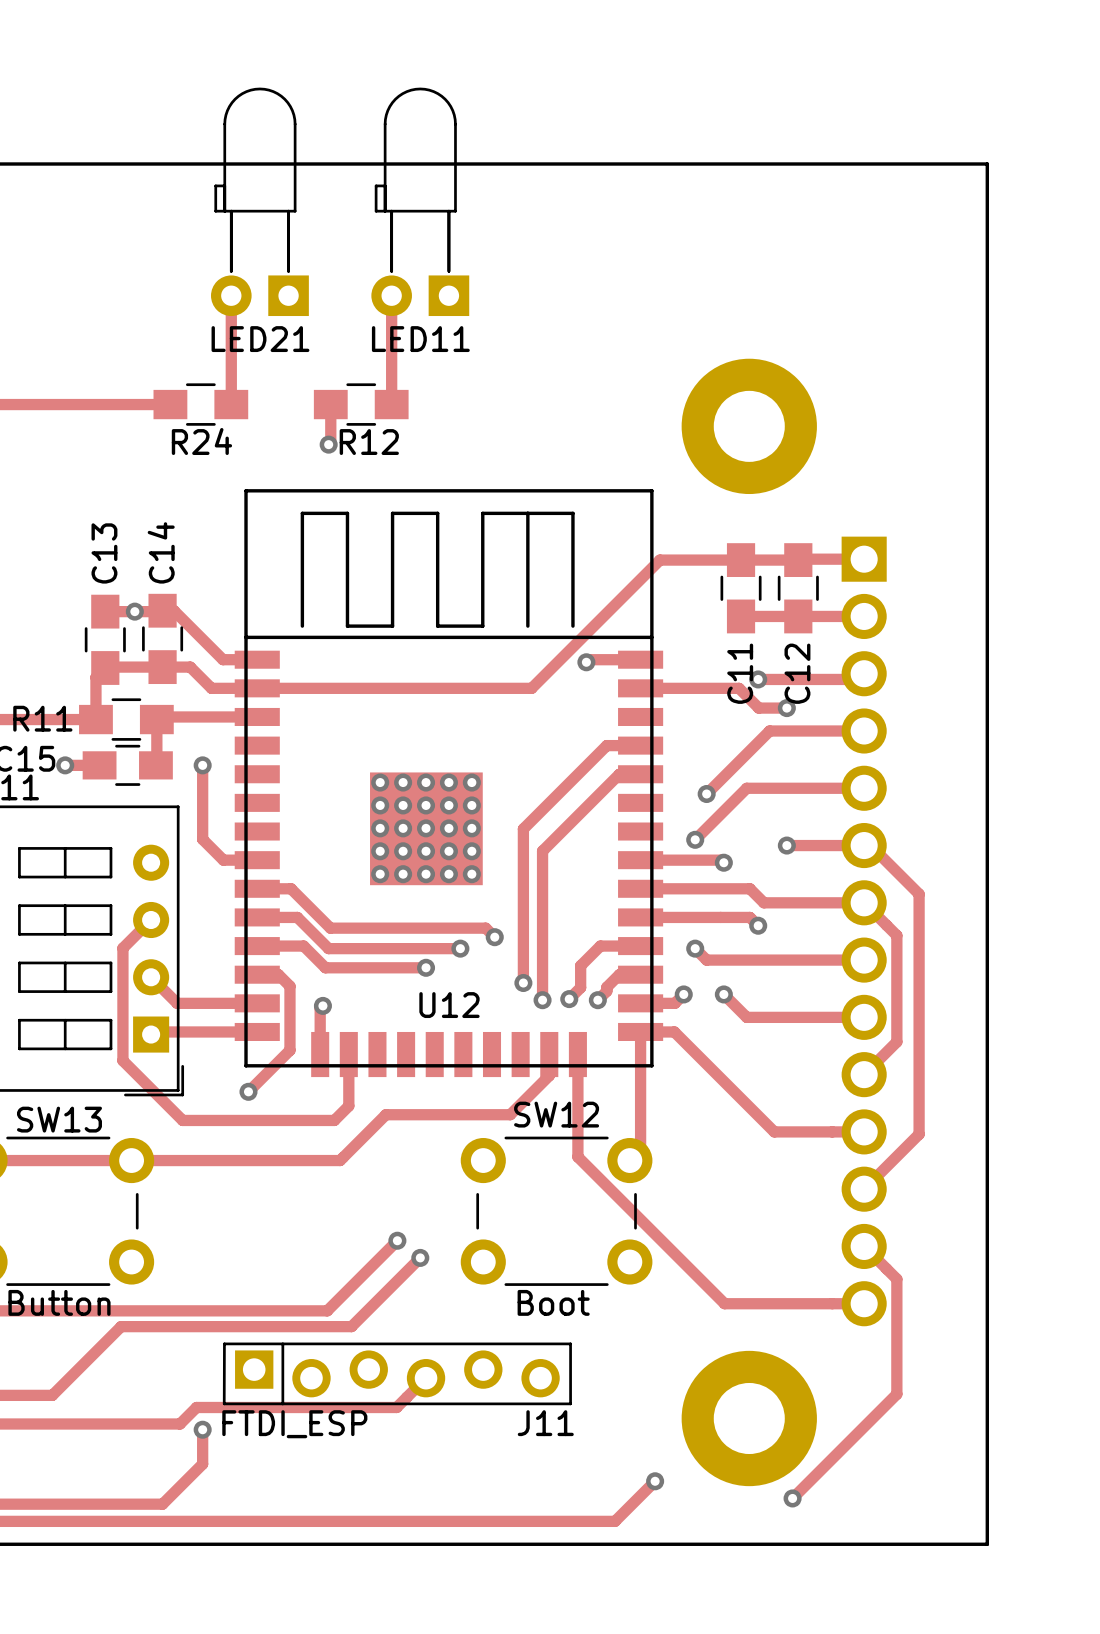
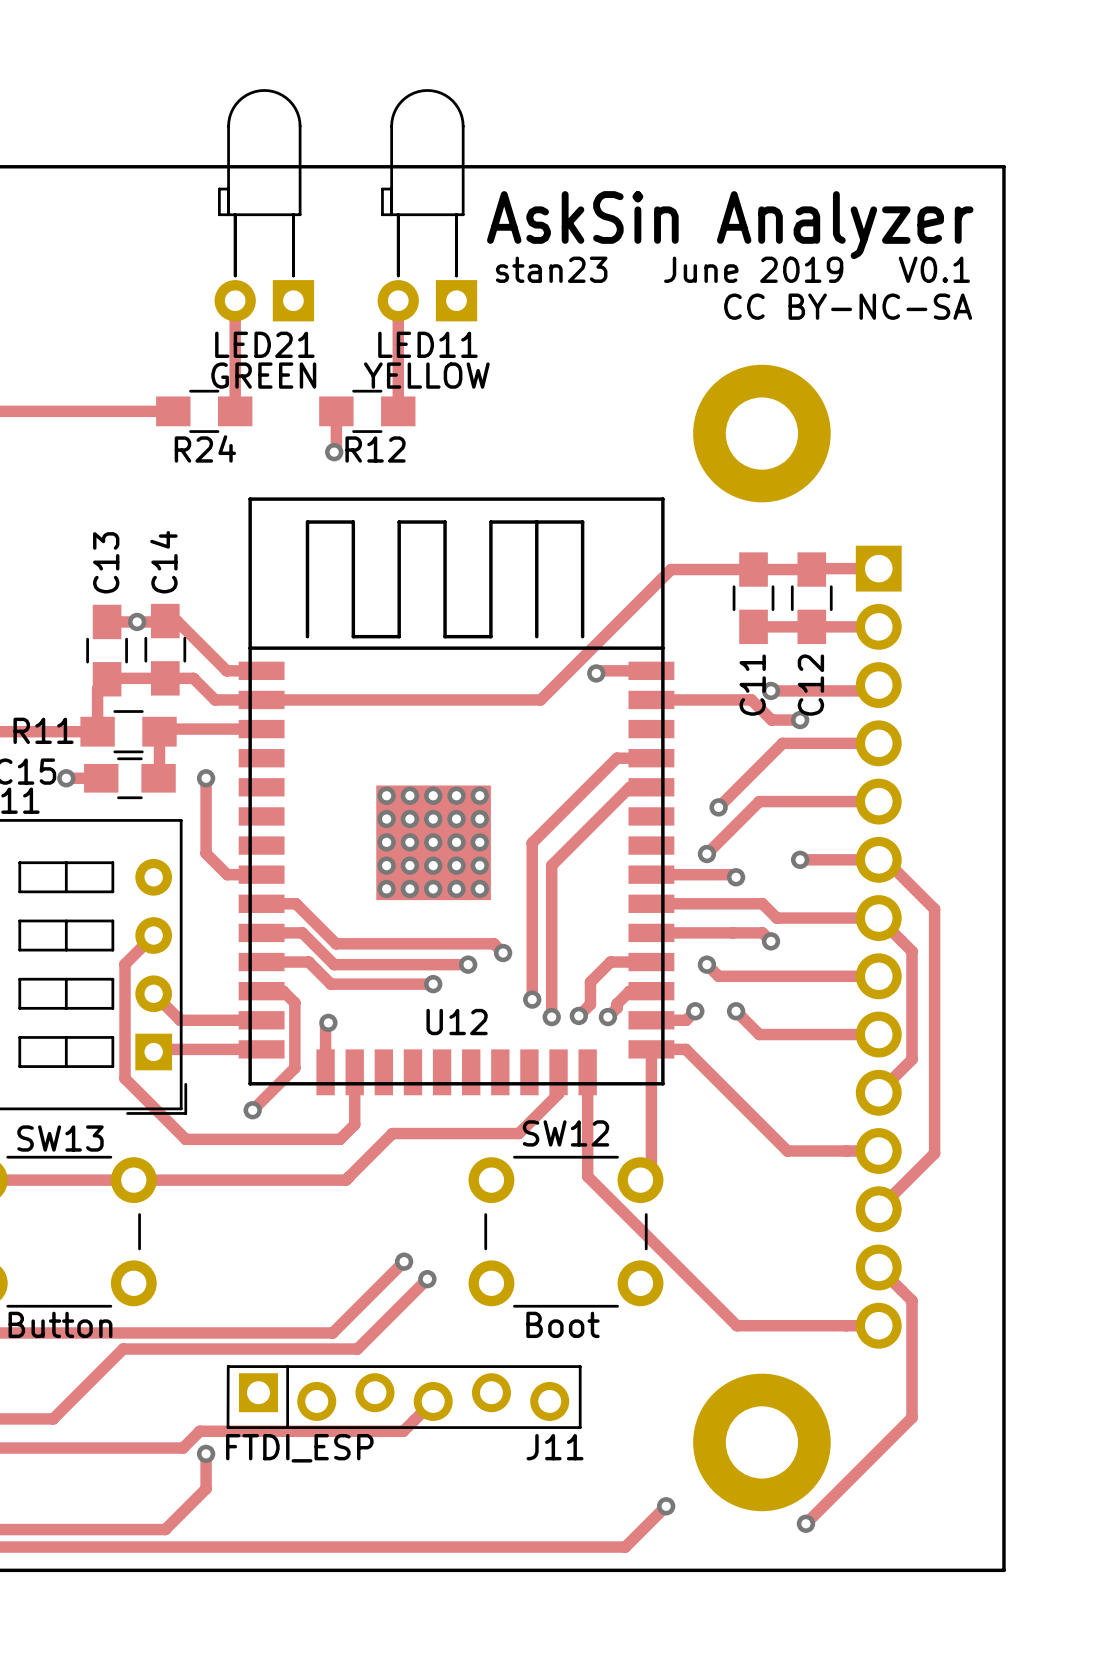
text: none -> AskSin Analyzer (730, 225)
text: none -> stan23 June 2019 V0.1 (732, 269)
text: none -> CC BY-NC-SA (848, 306)
LED21 value: none -> GREEN (263, 375)
LED11 value: none -> YELLOW (426, 375)

